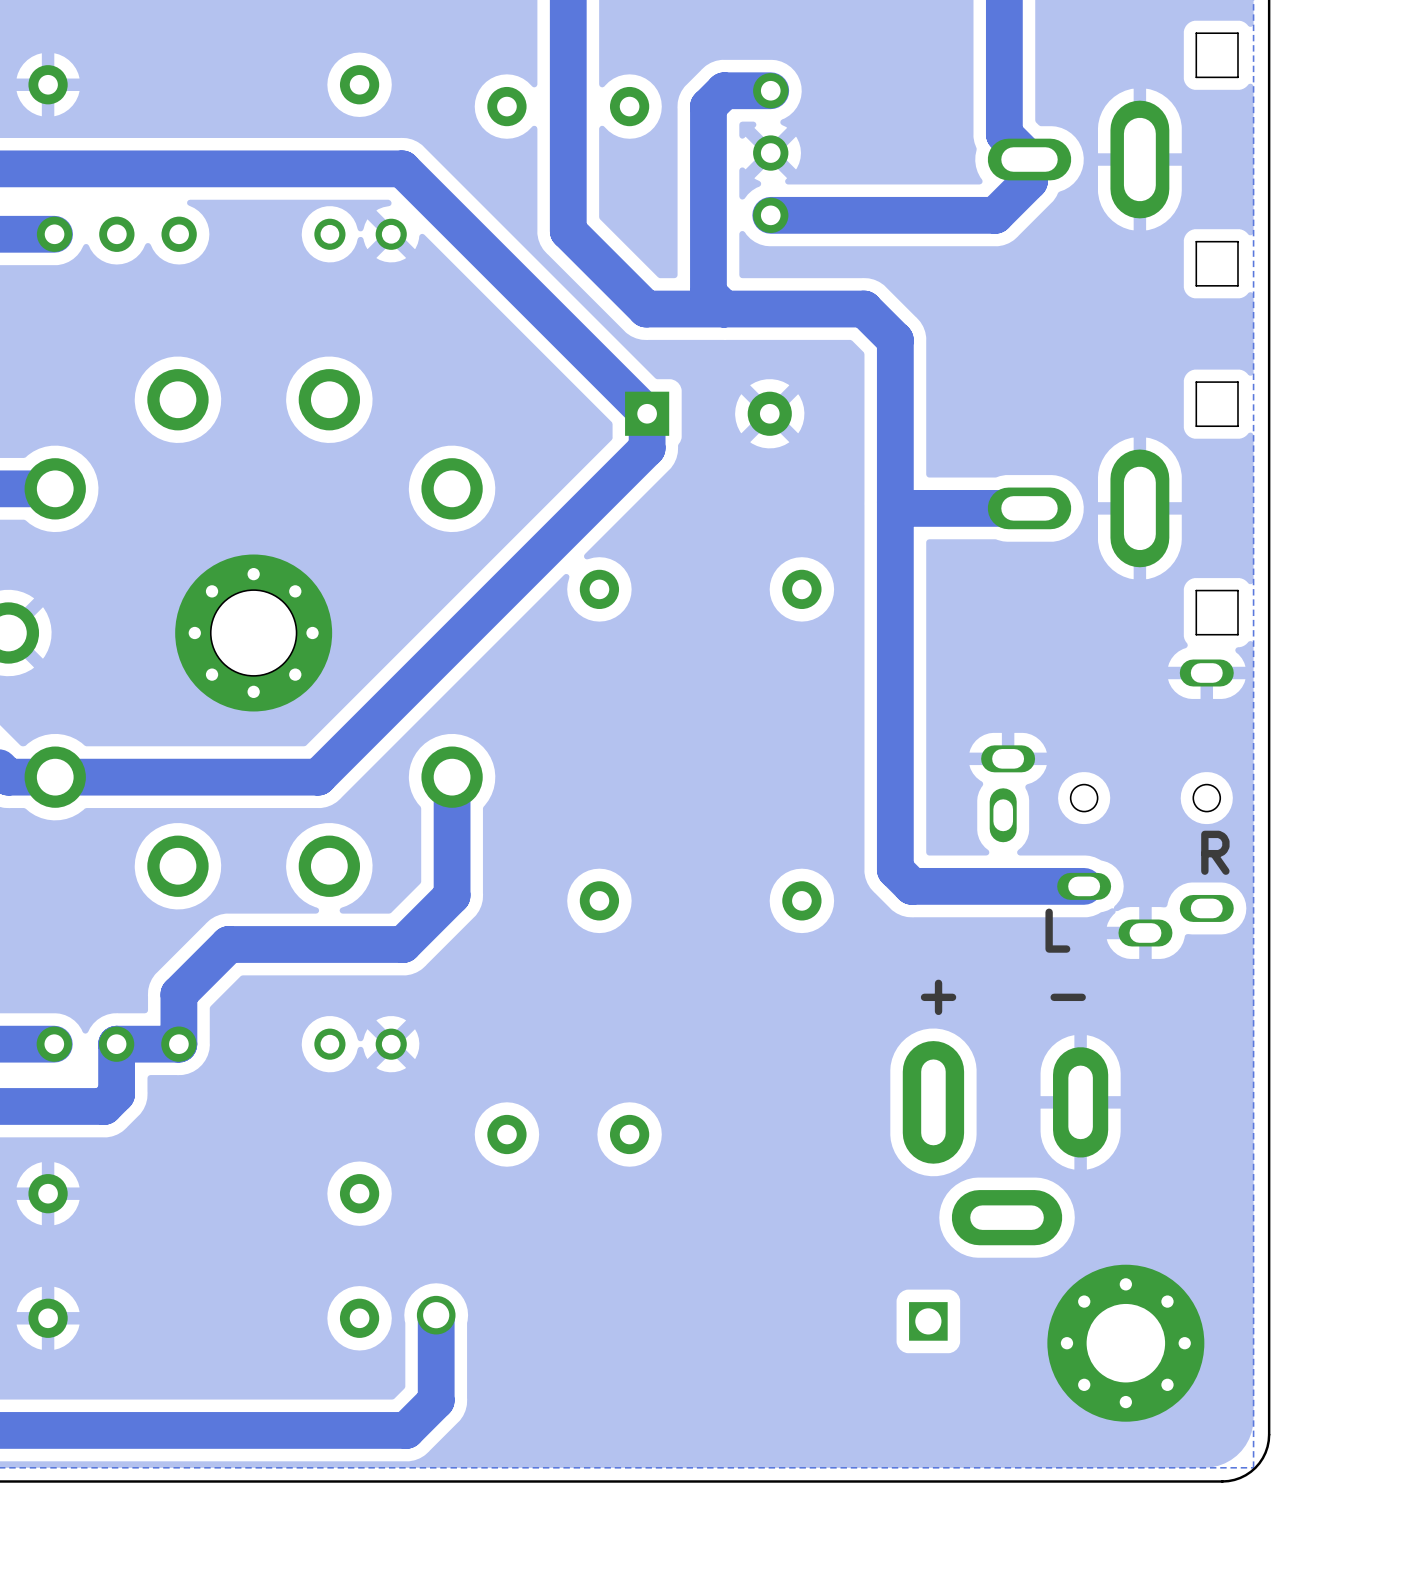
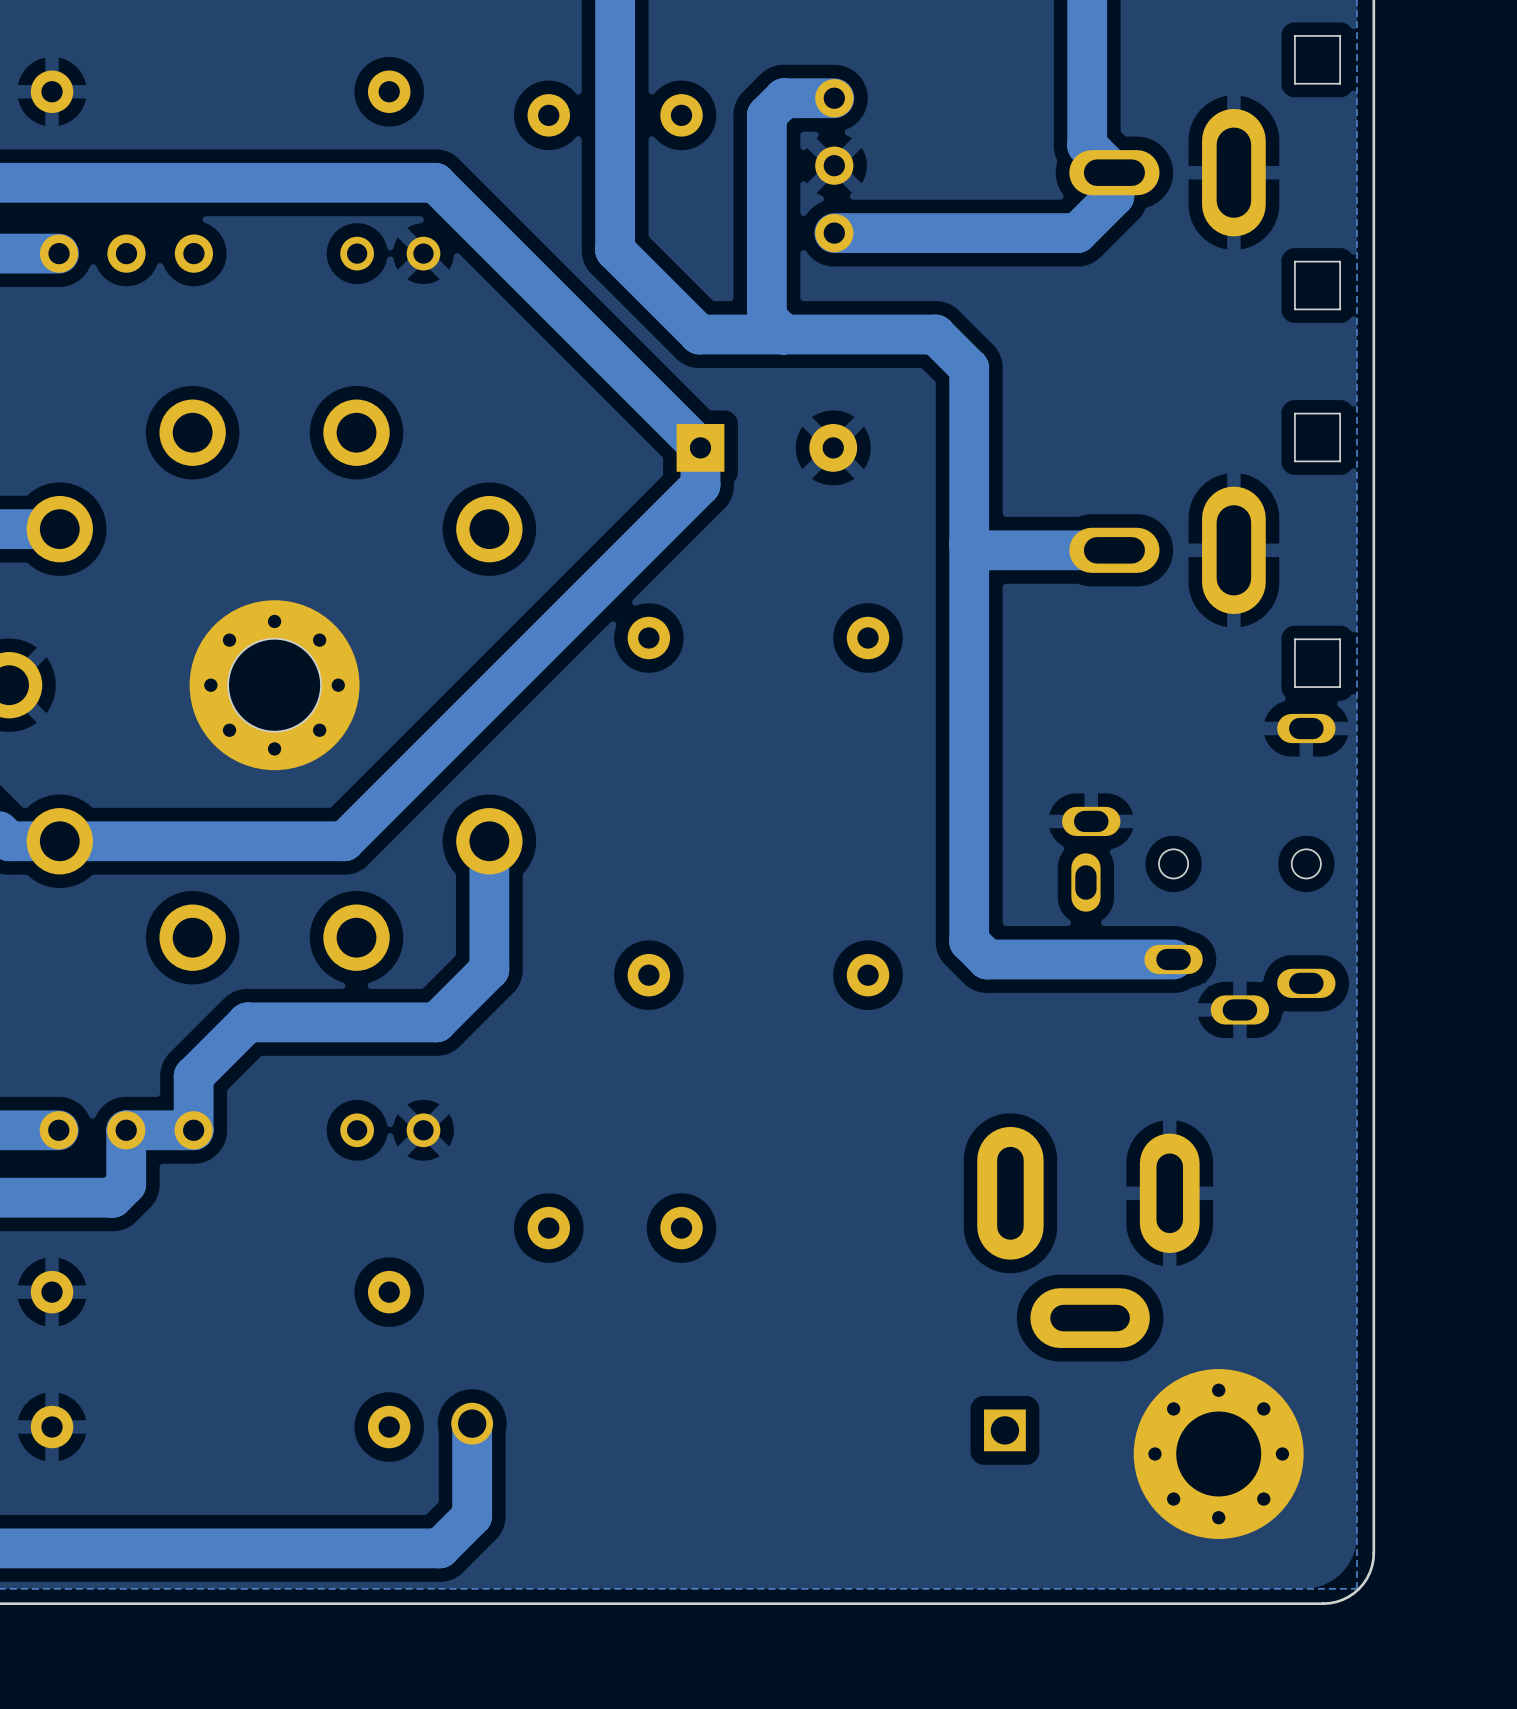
text: R (1215, 852) -> none
text: L (1057, 930) -> none
text: + - (1003, 997) -> none

